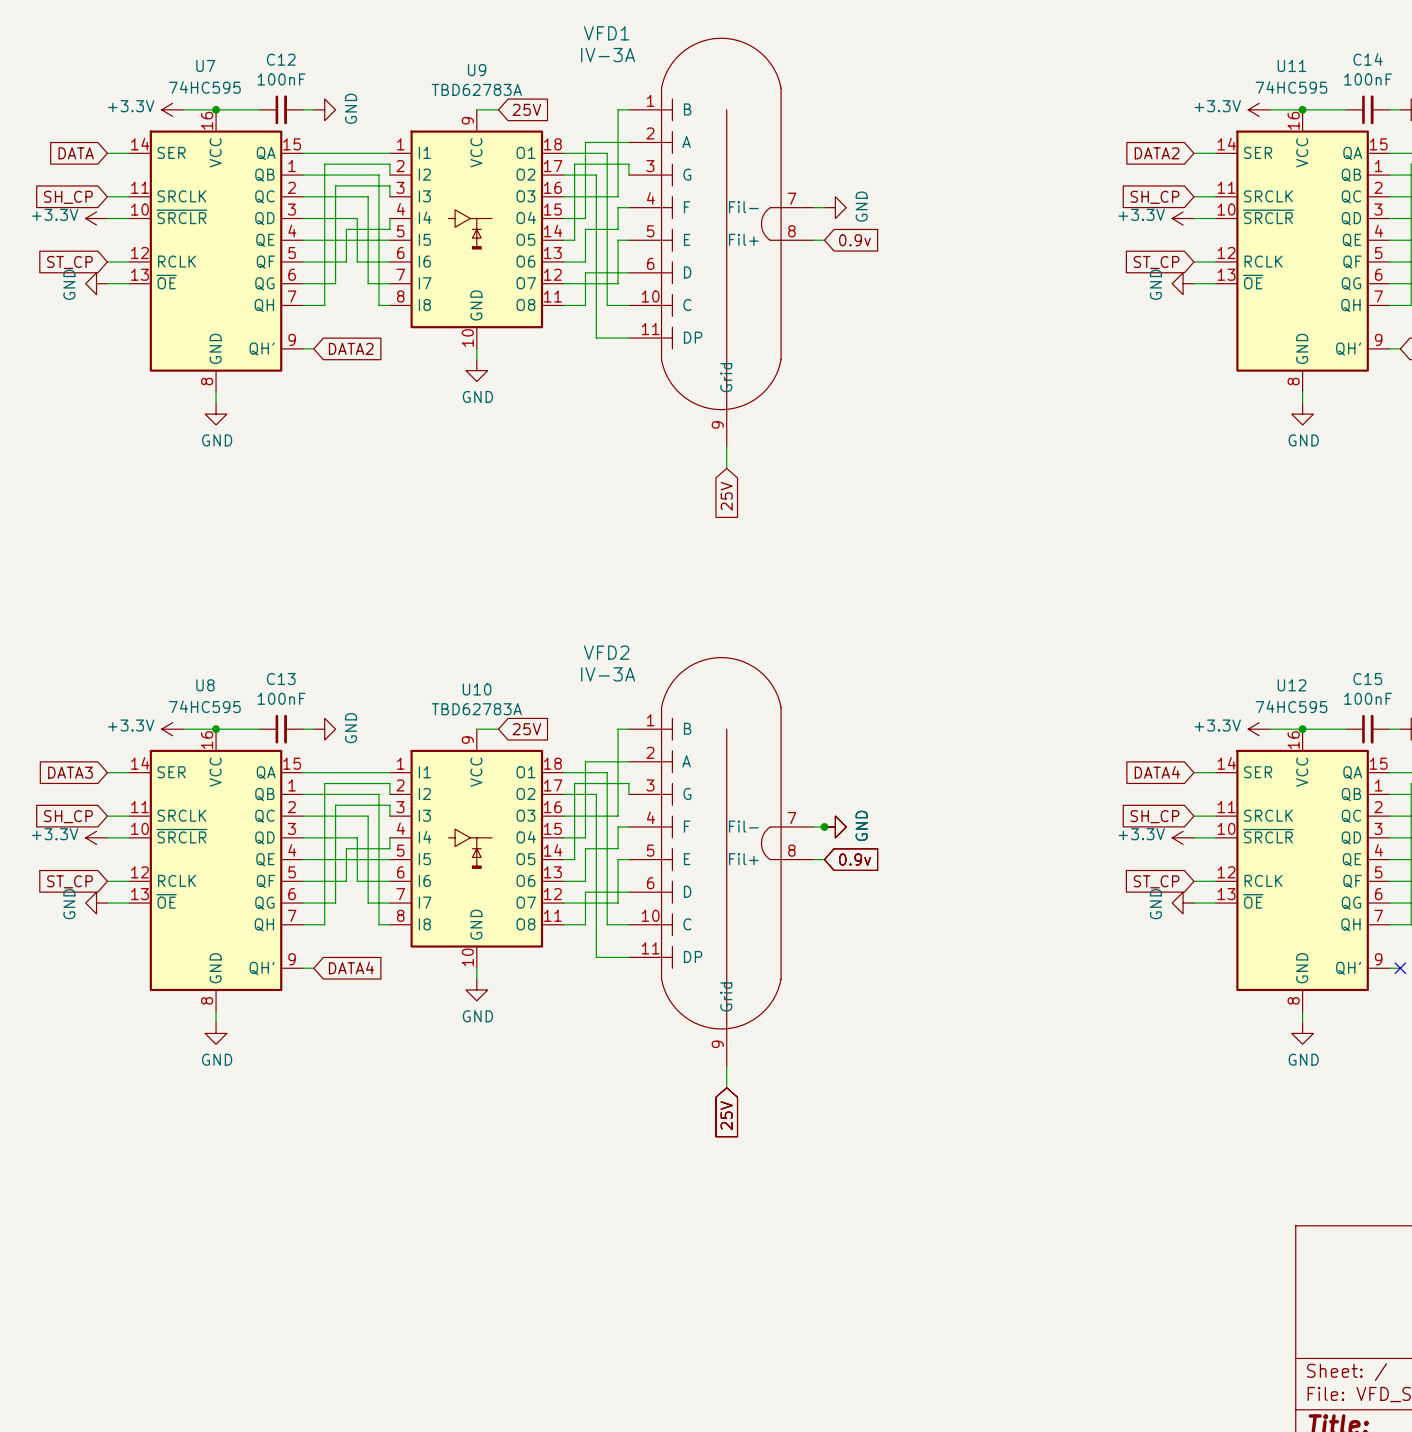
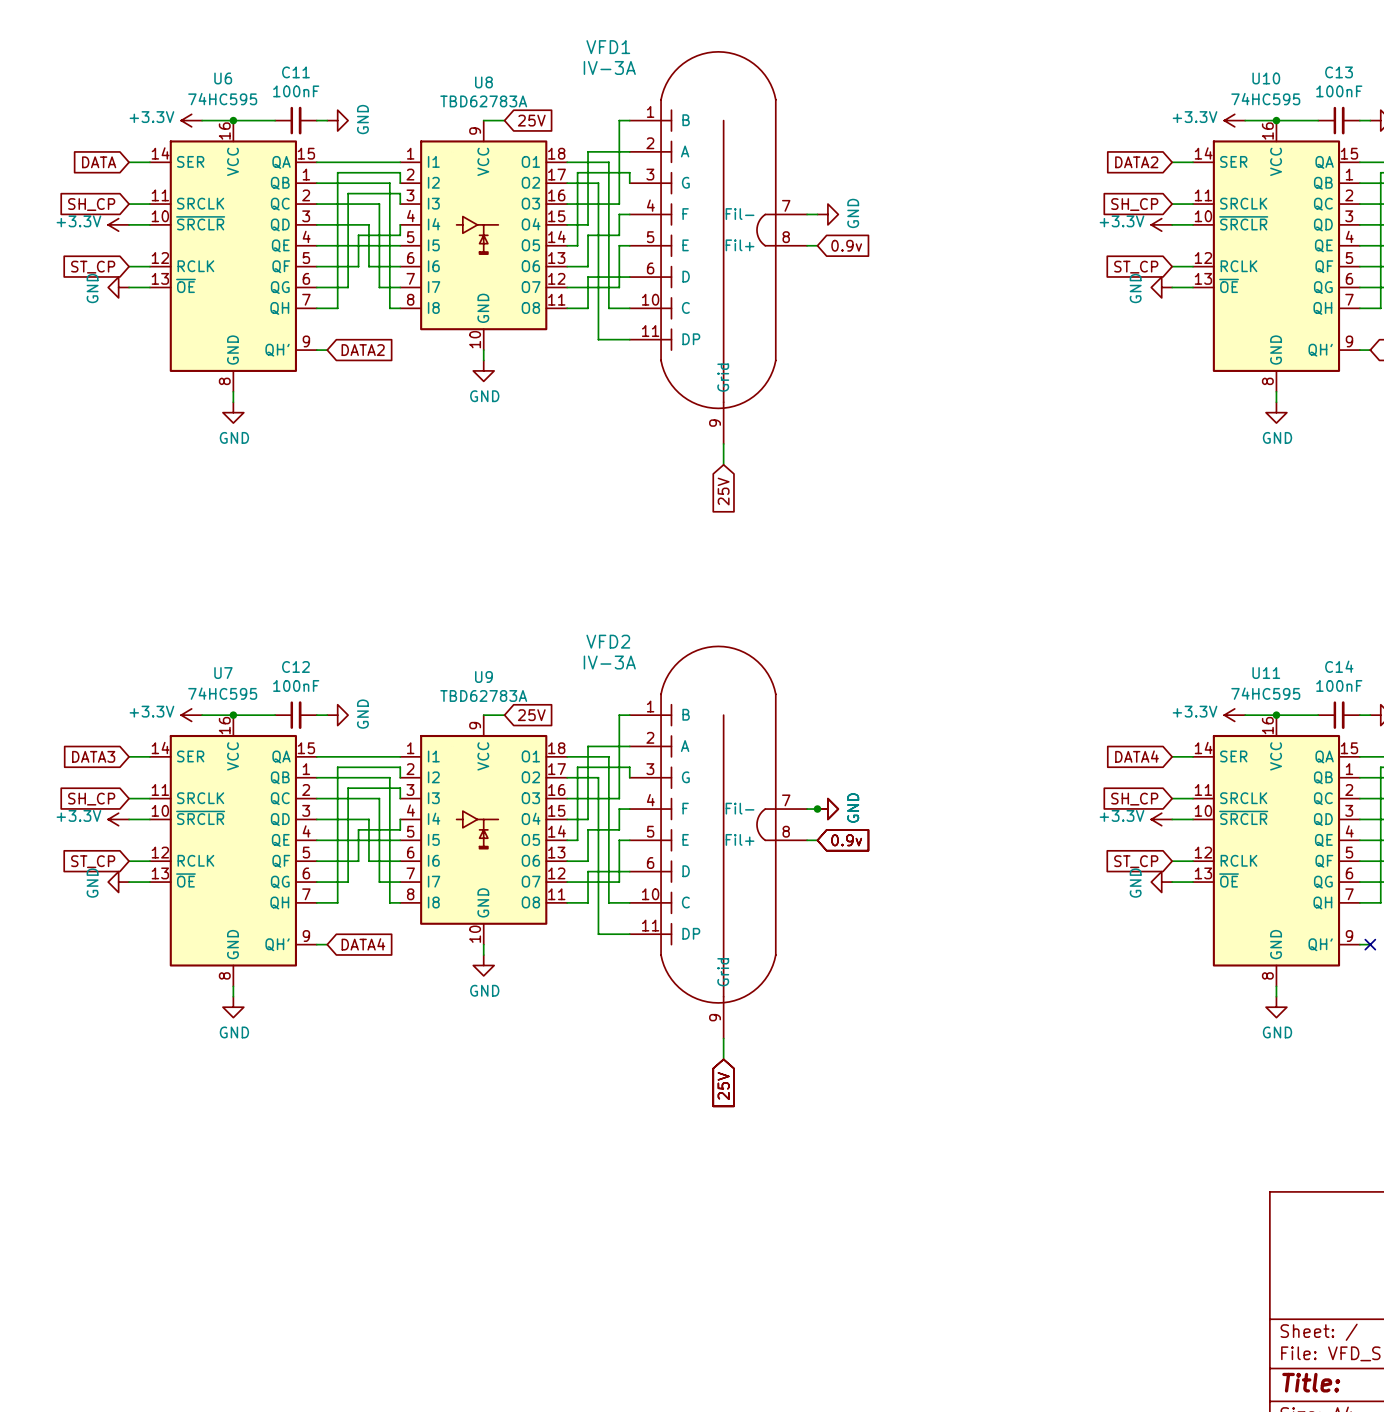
C12 name: C12 (281, 59) -> C11 (295, 72)
C14 name: C14 (1368, 59) -> C13 (1339, 72)
U7 name: U7 (205, 65) -> U6 (223, 78)
U11 name: U11 (1291, 65) -> U10 (1266, 78)
U9 name: U9 (477, 70) -> U8 (483, 82)
C13 name: C13 (281, 679) -> C12 (295, 666)
C15 name: C15 (1367, 679) -> C14 (1339, 666)
U8 name: U8 (205, 685) -> U7 (223, 673)
U12 name: U12 (1291, 685) -> U11 (1266, 673)
U10 name: U10 (477, 689) -> U9 (483, 677)

